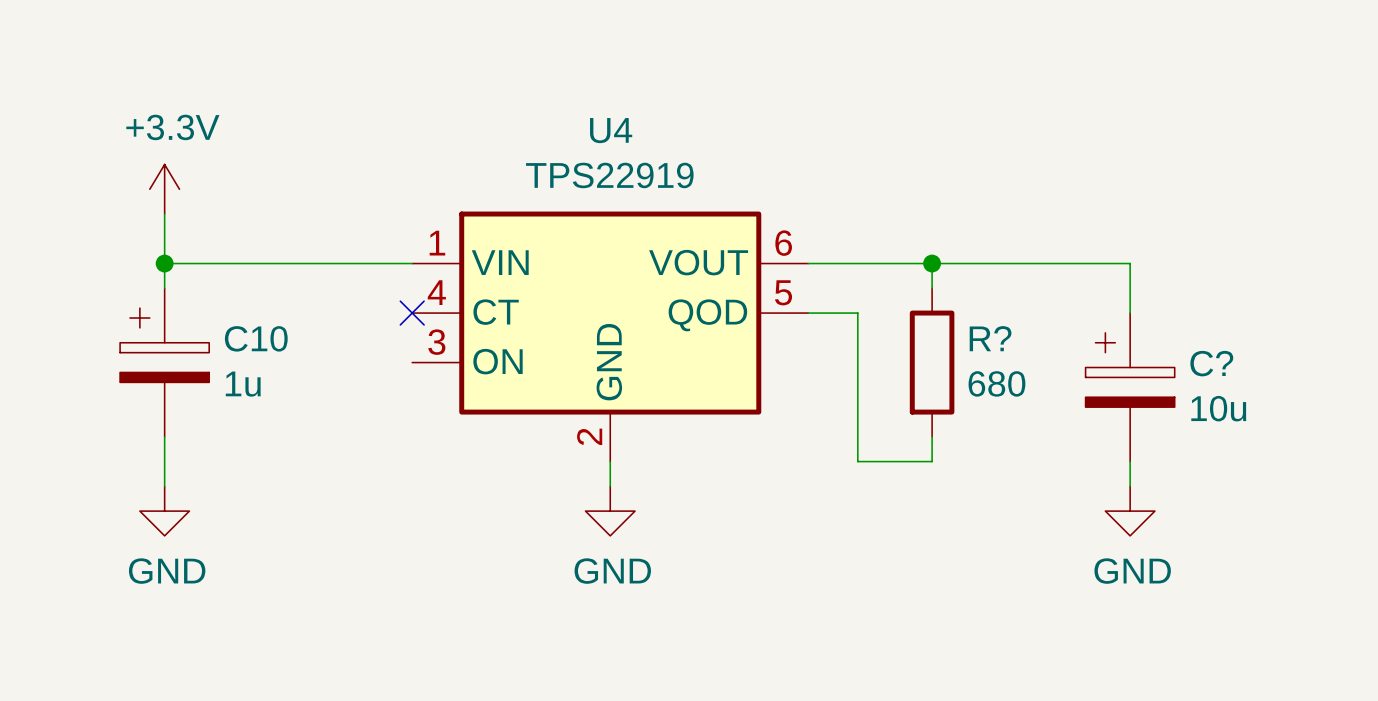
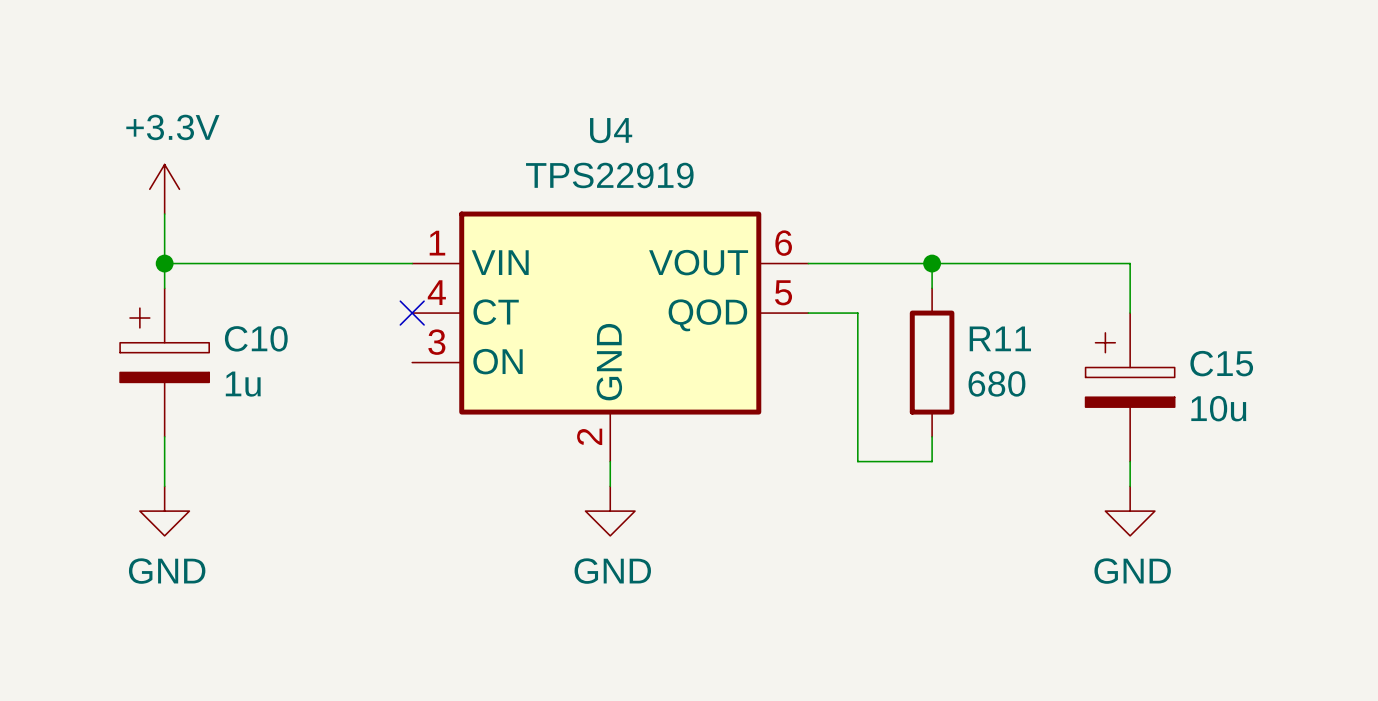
R? name: R? (990, 338) -> R11 (1000, 338)
C? name: C? (1211, 363) -> C15 (1221, 363)

